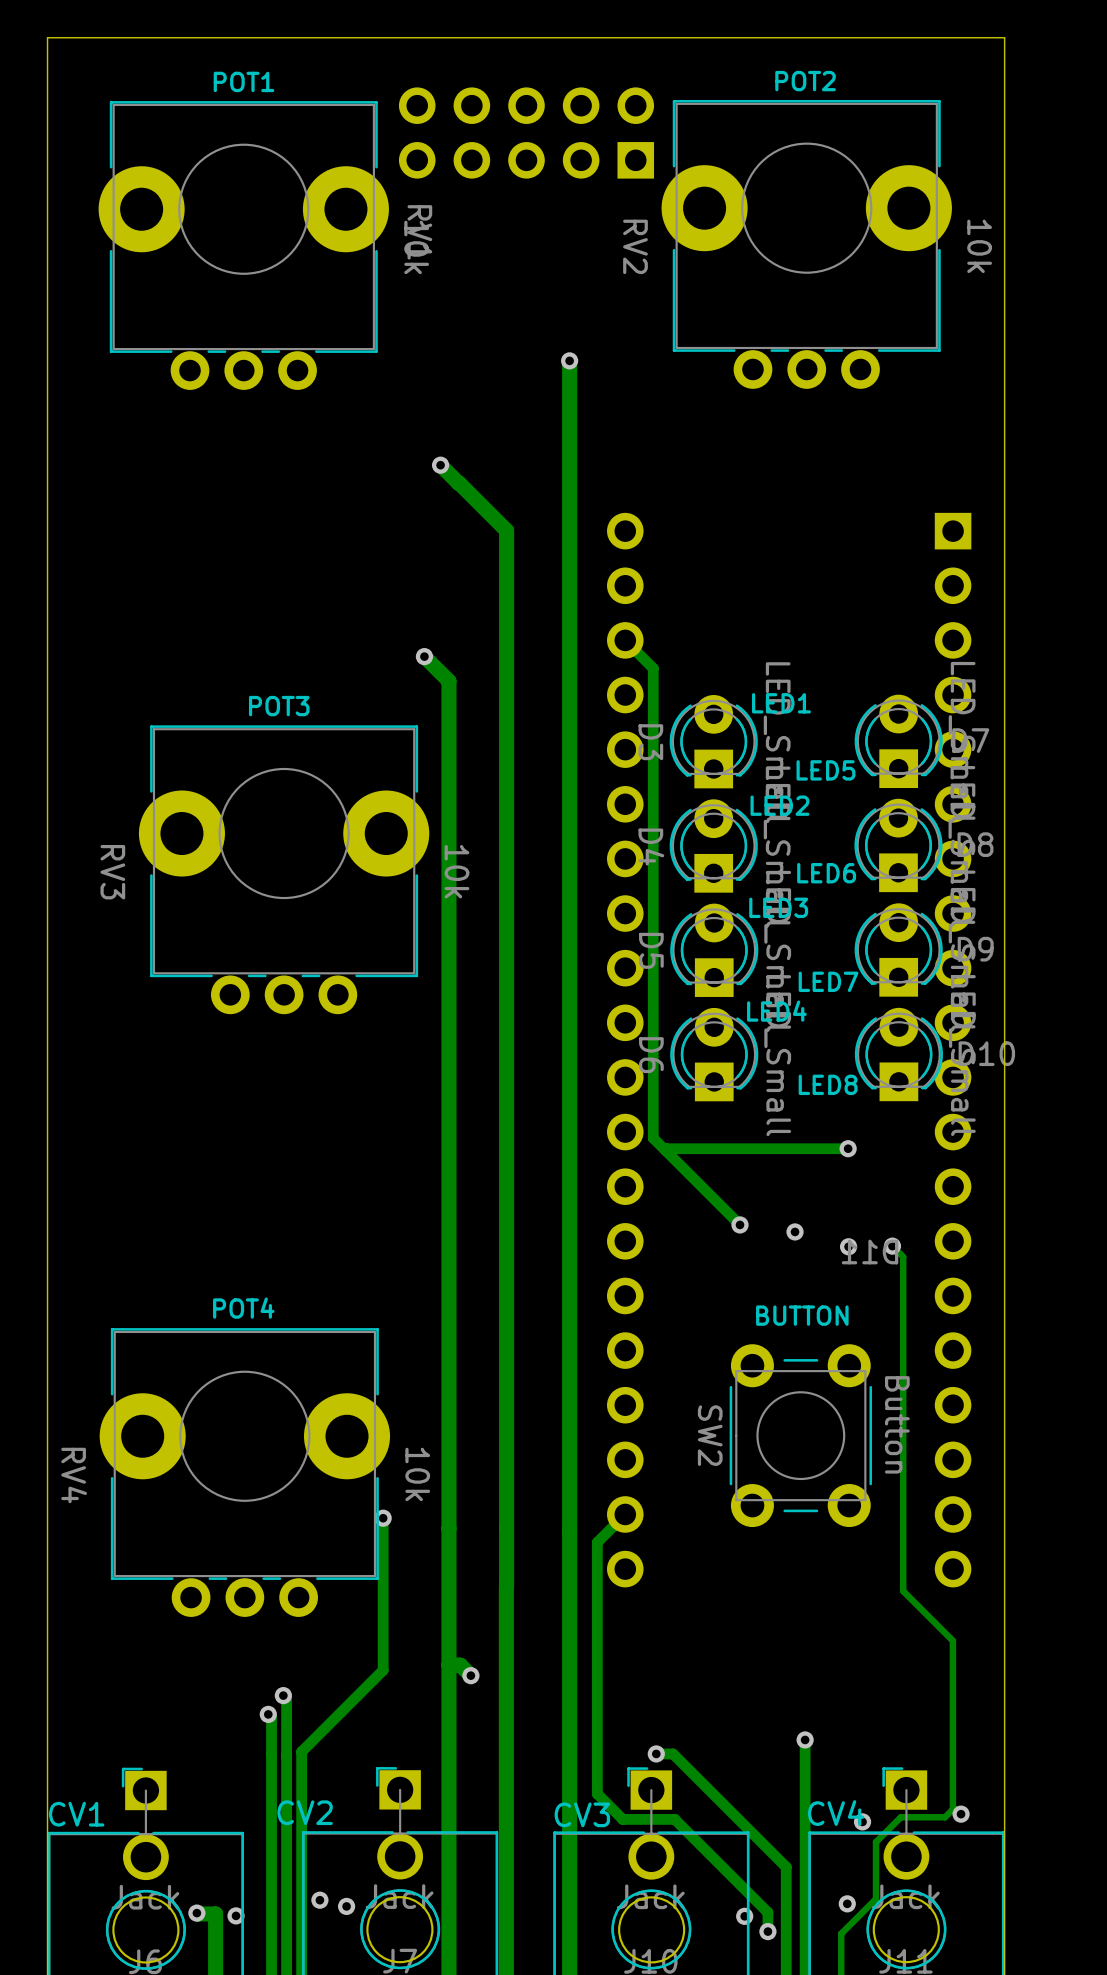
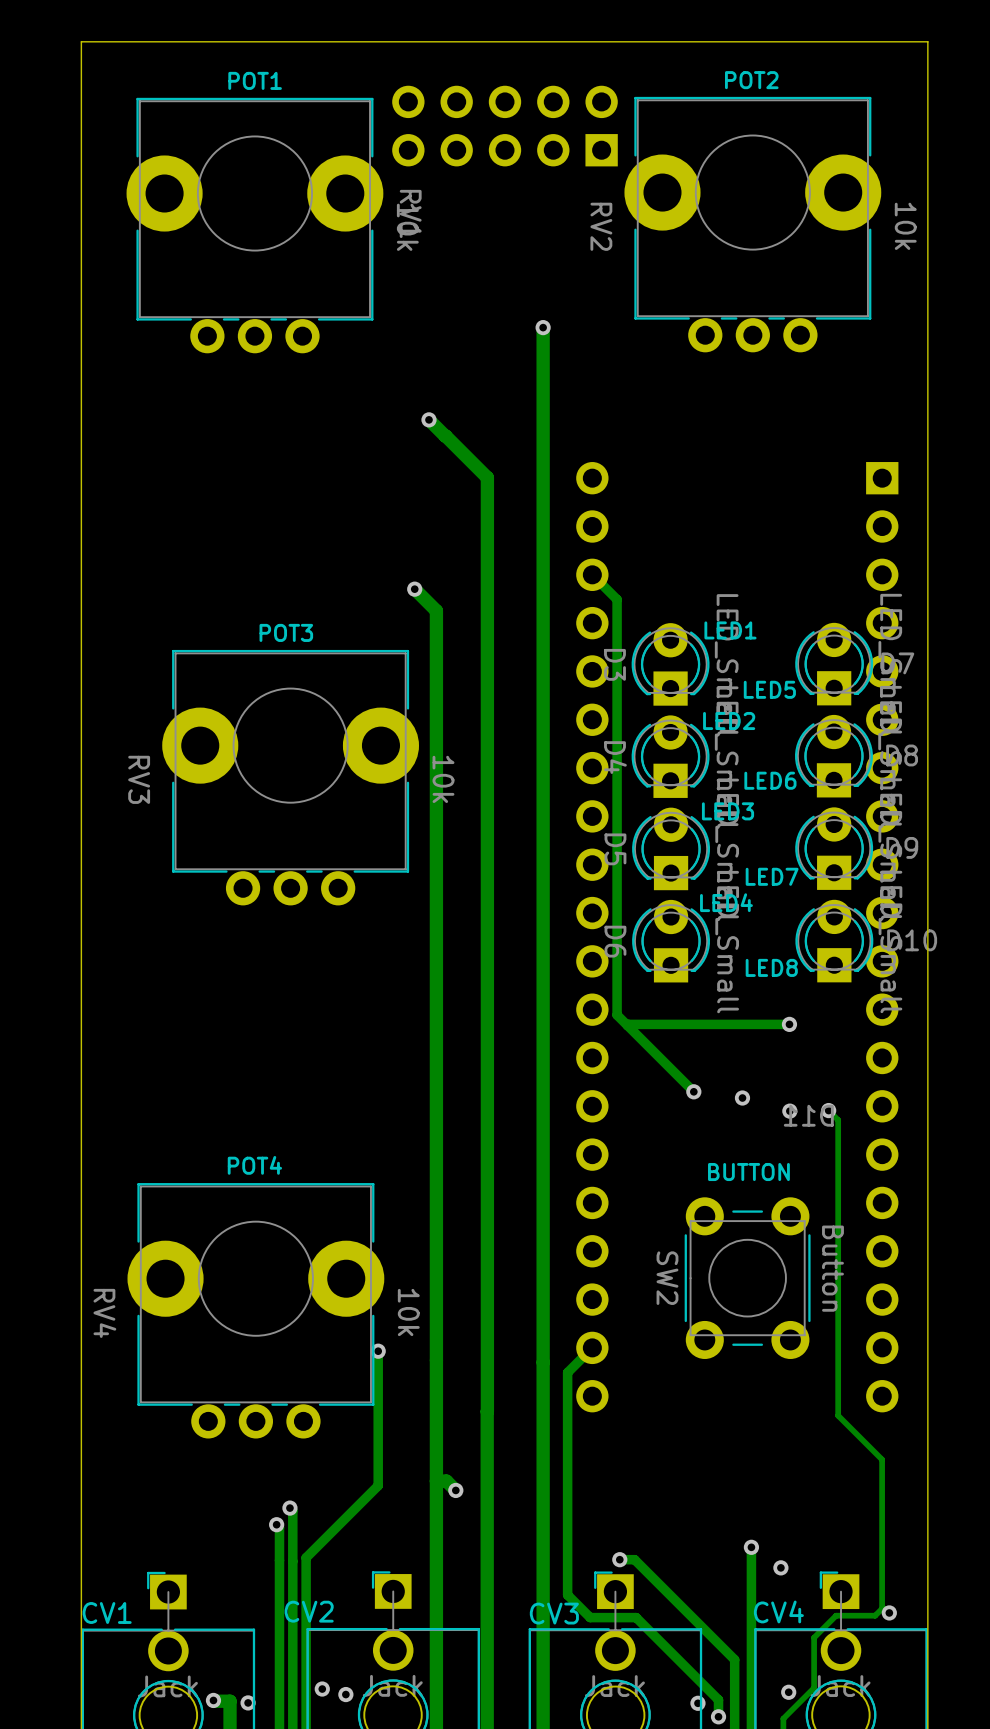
via position: (862, 1821) -> (780, 1567)

